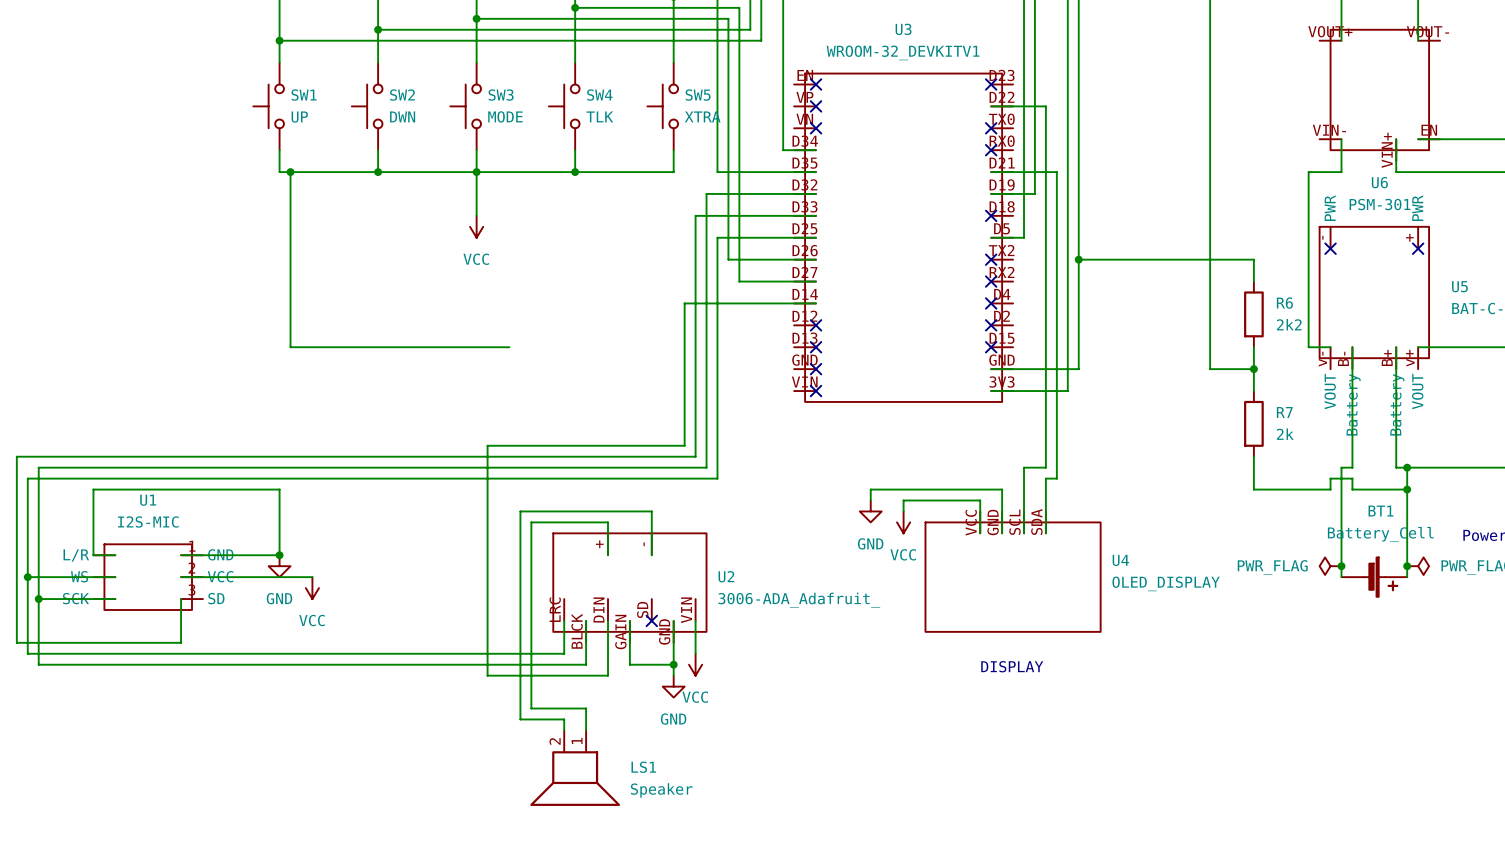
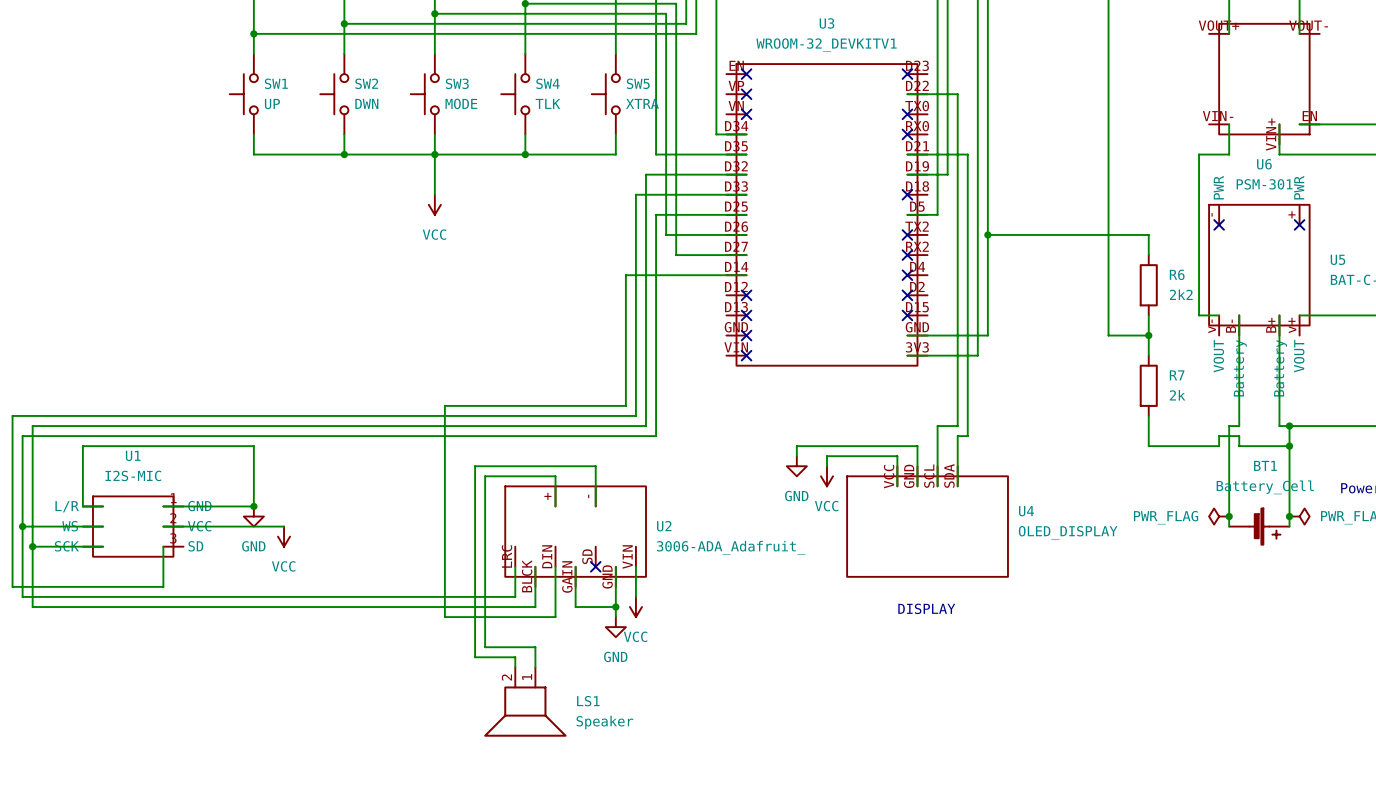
wire: (290, 172) (290, 347) (509, 347) -> none
junction: (290, 172) -> none

